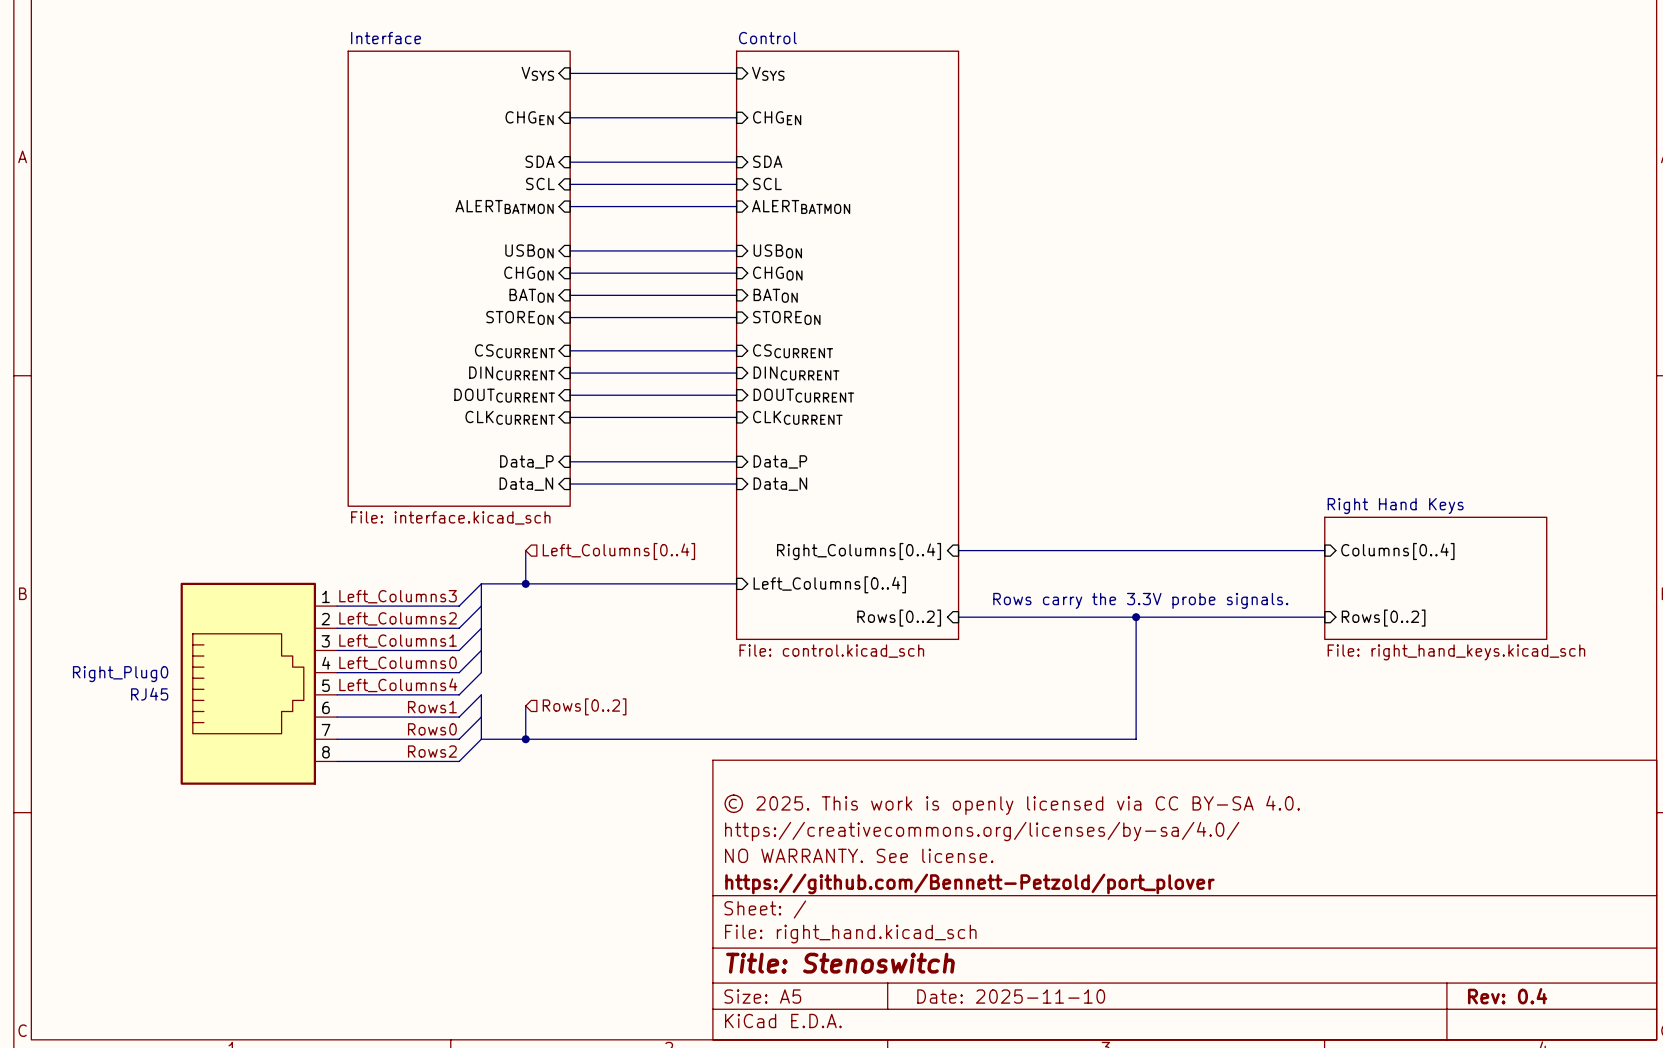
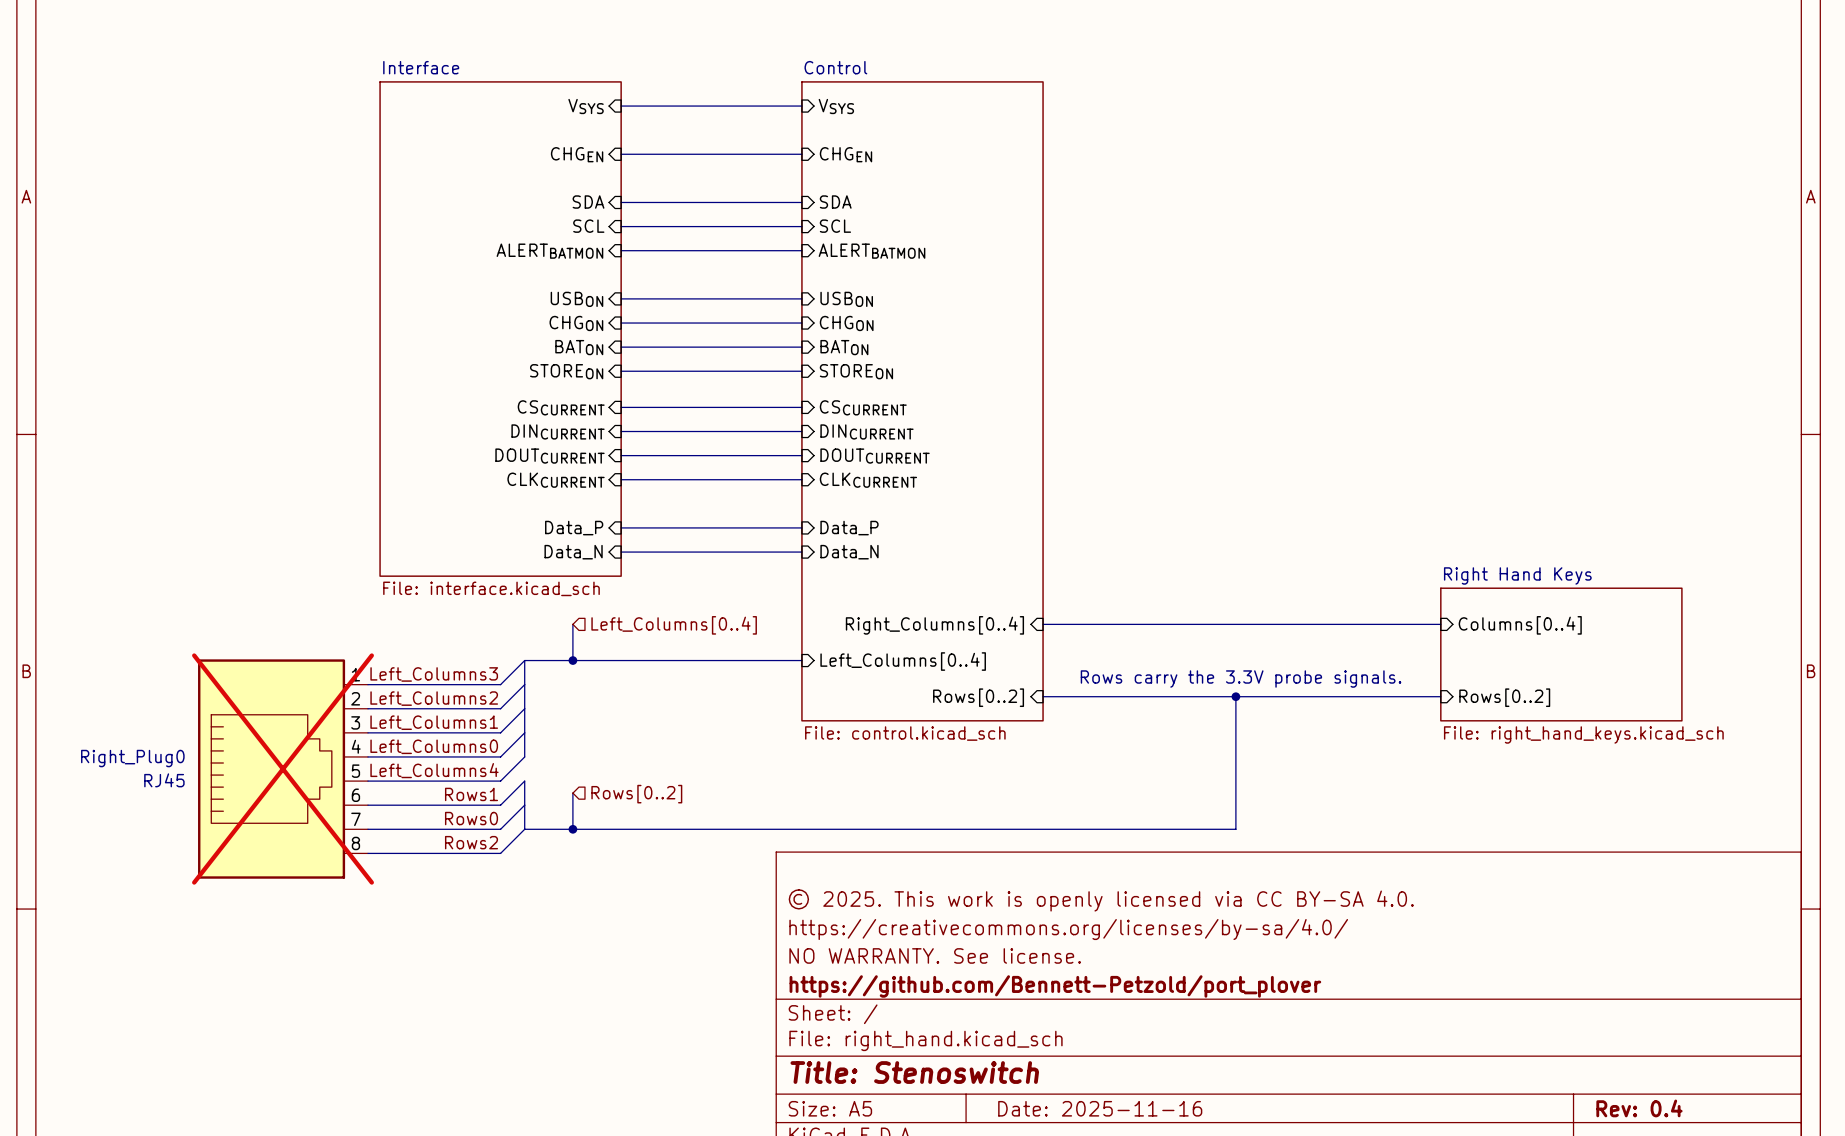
Right_Plug0 do-not-place cross: none -> (283, 769)
title block: Date: 2025-11-10 (1011, 996) -> Date: 2025-11-16 (1100, 1108)

